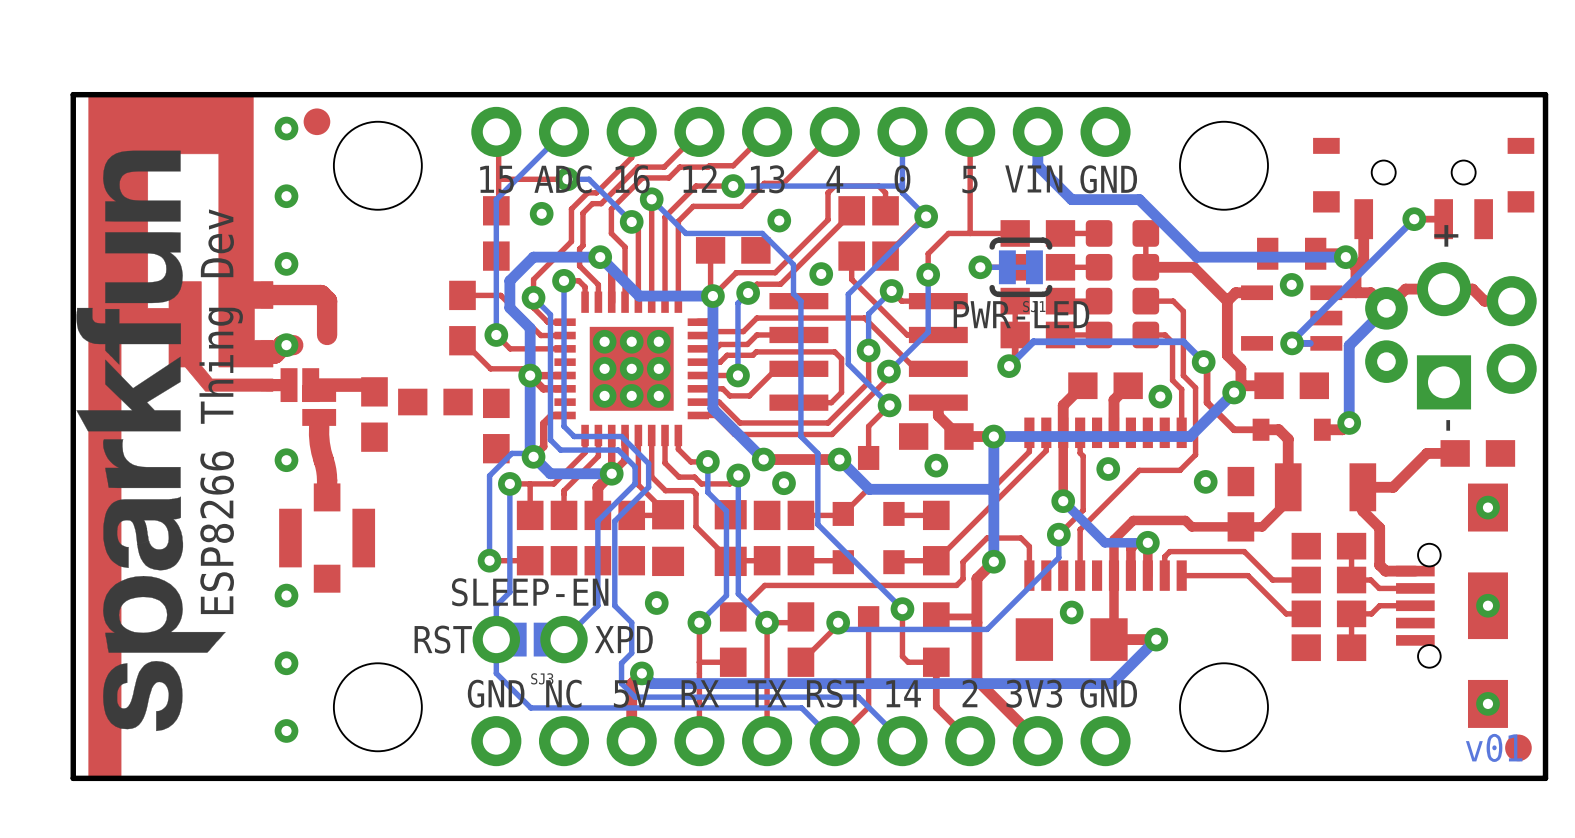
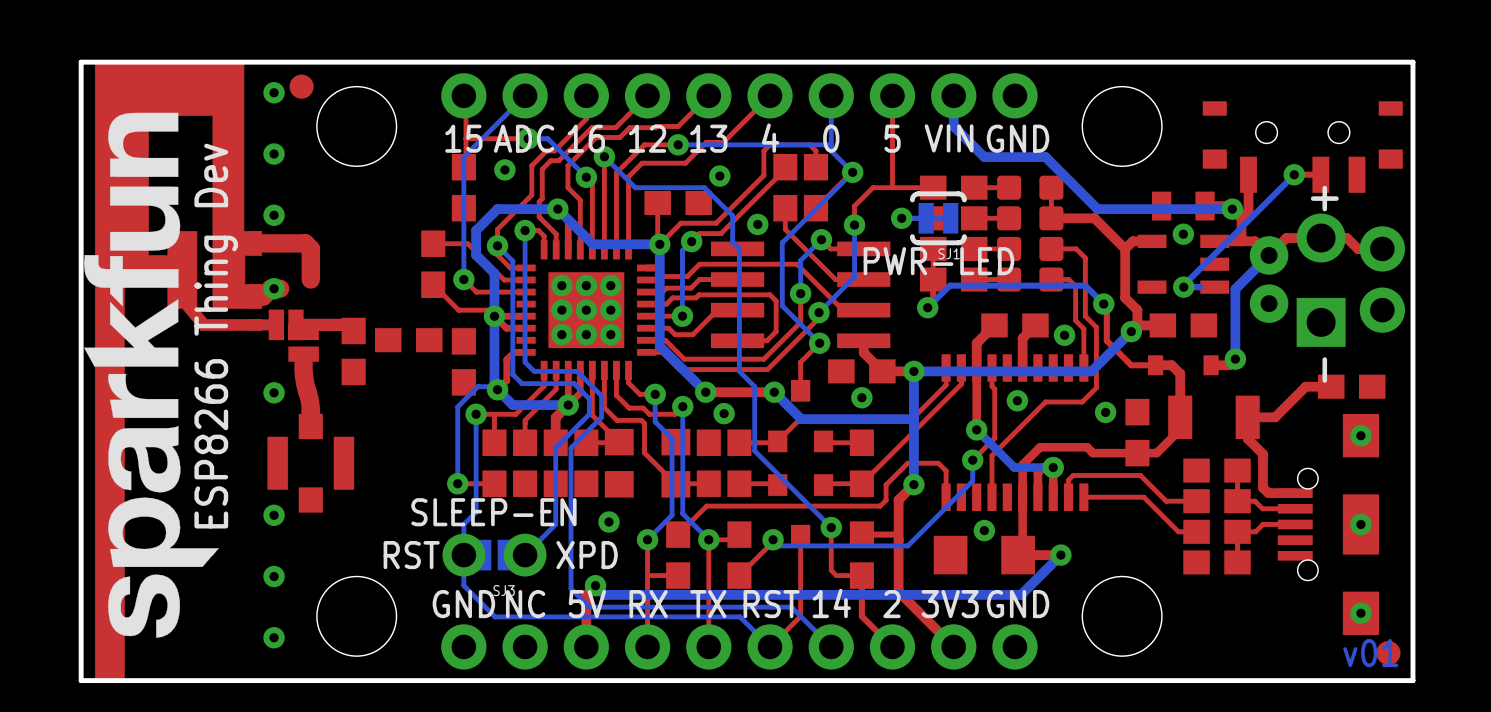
bottom track: (614, 605) (631, 622) (631, 653) (621, 663) (621, 683) -> (571, 524) (571, 588) (577, 594)

